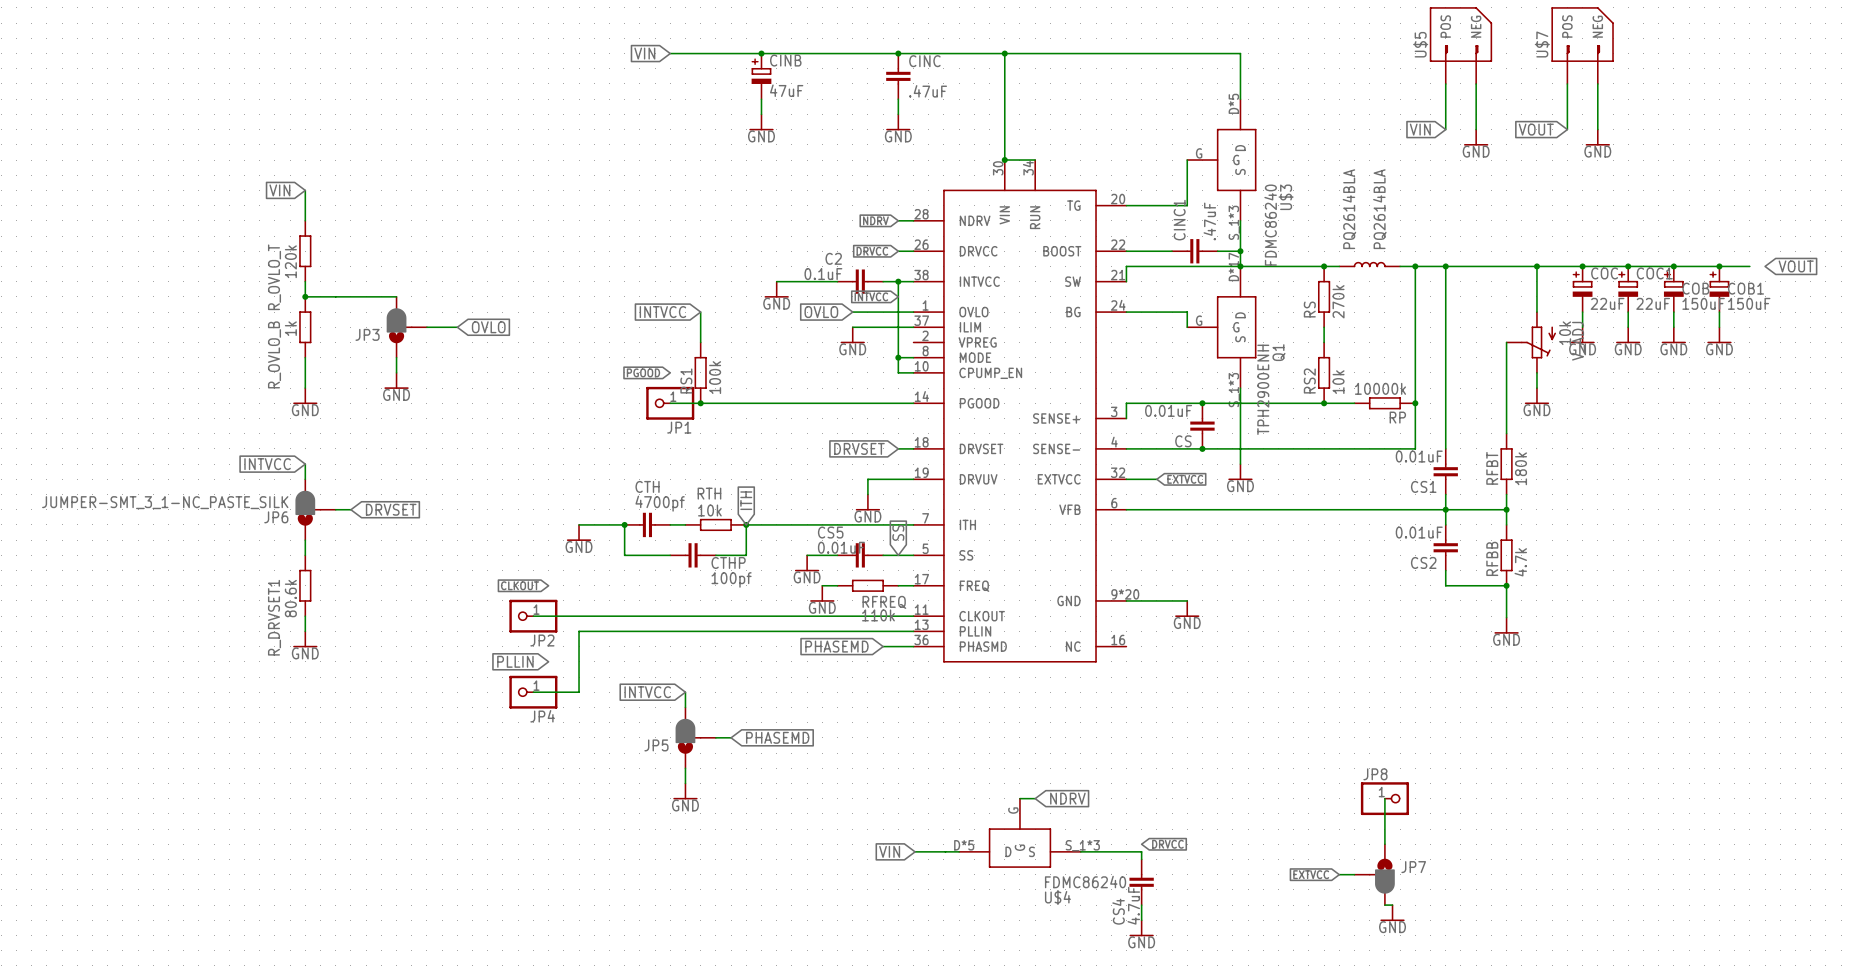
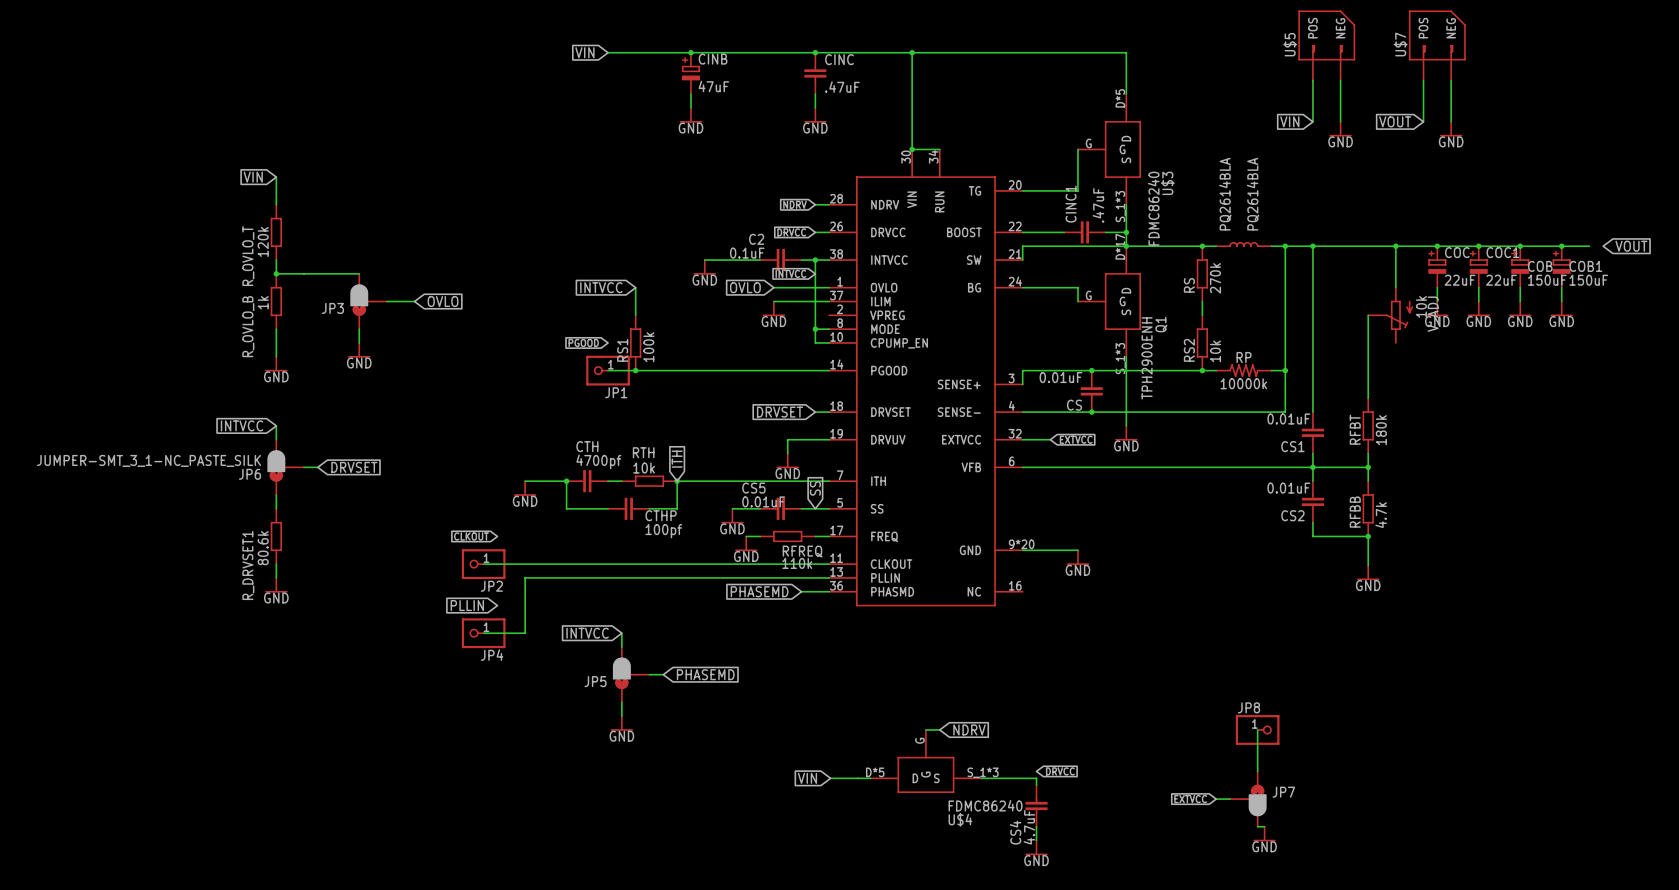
wire: (1536, 372) (1536, 388) -> none
power symbol: GND (1536, 396) -> none
RP: none -> 10000k (1243, 370)
RP: 10000k (1384, 403) -> none

